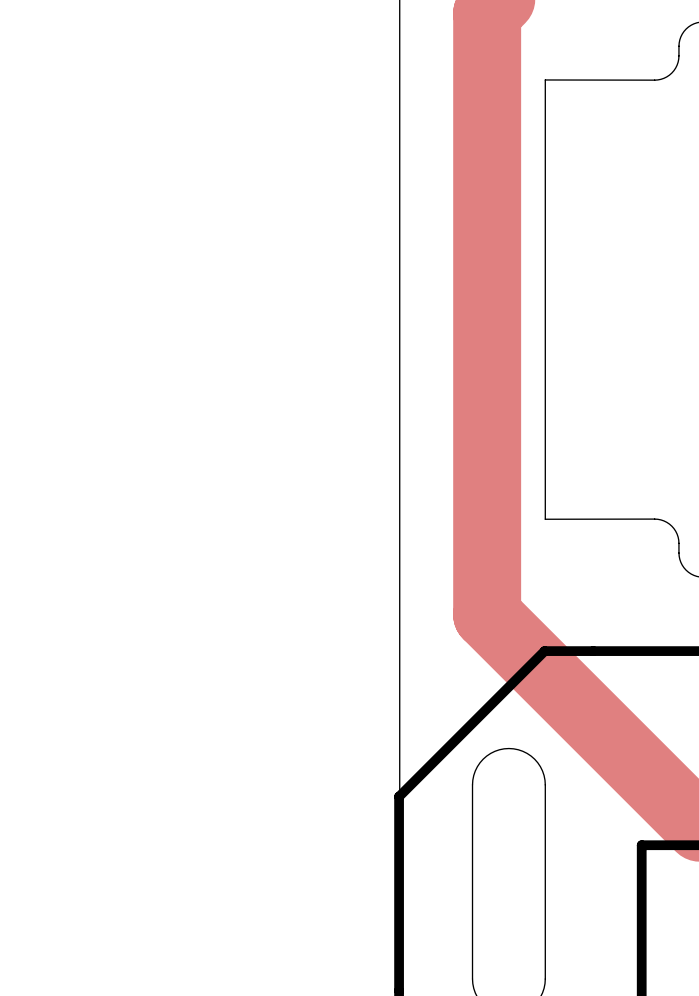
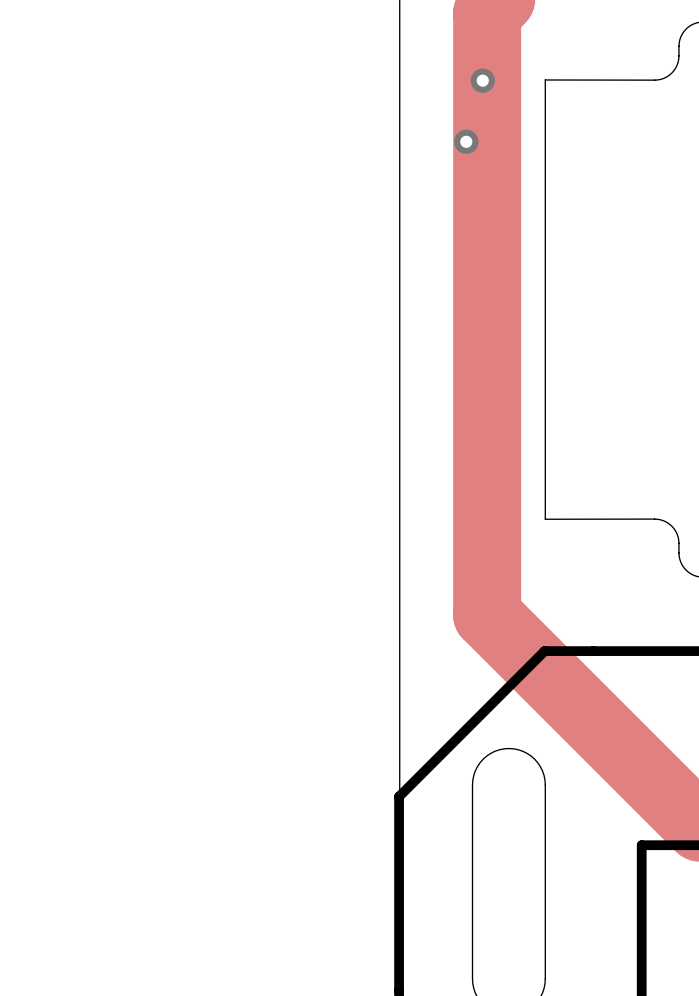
via: none -> (482, 80)
via: none -> (466, 141)

